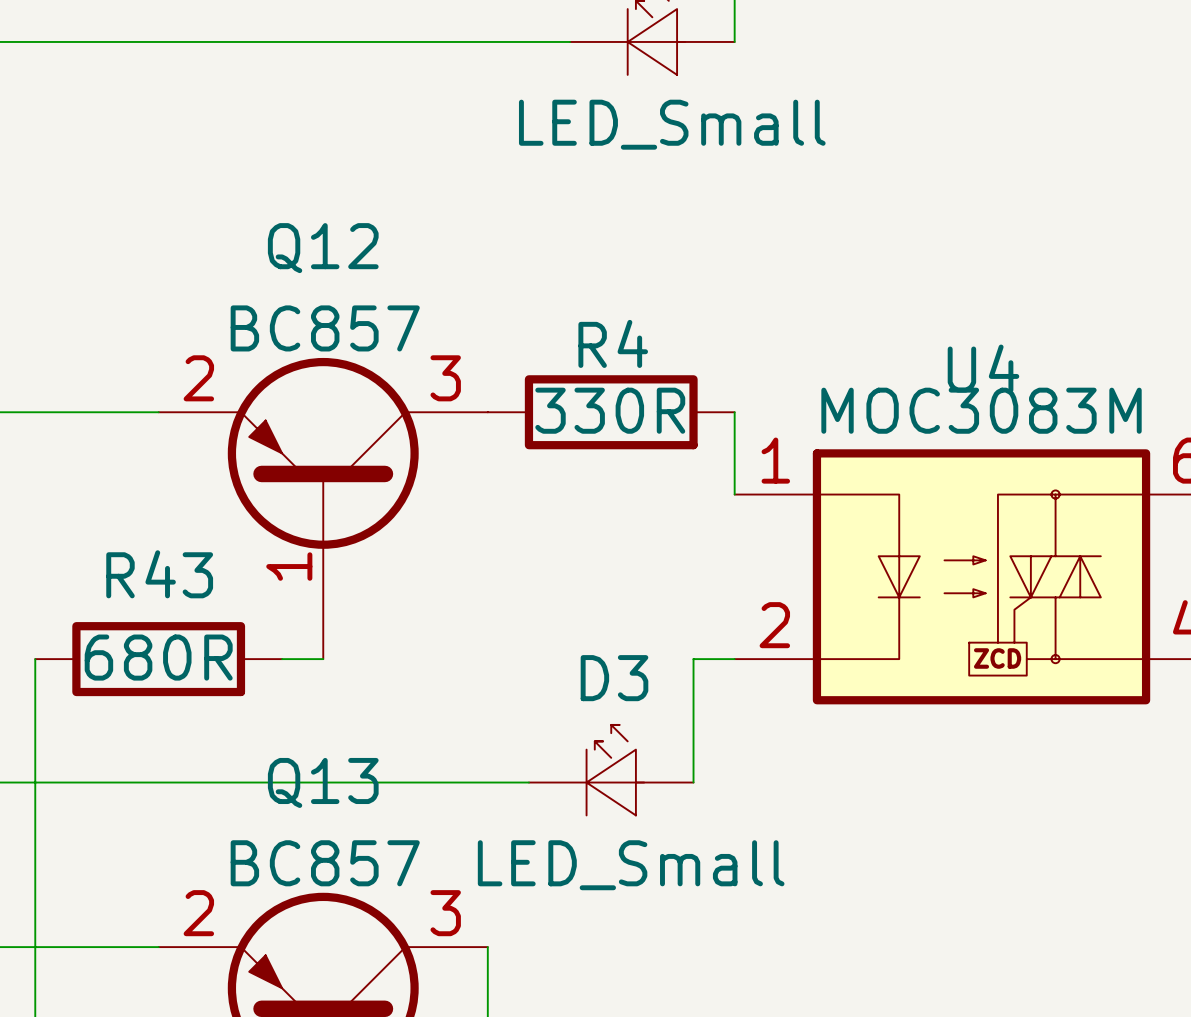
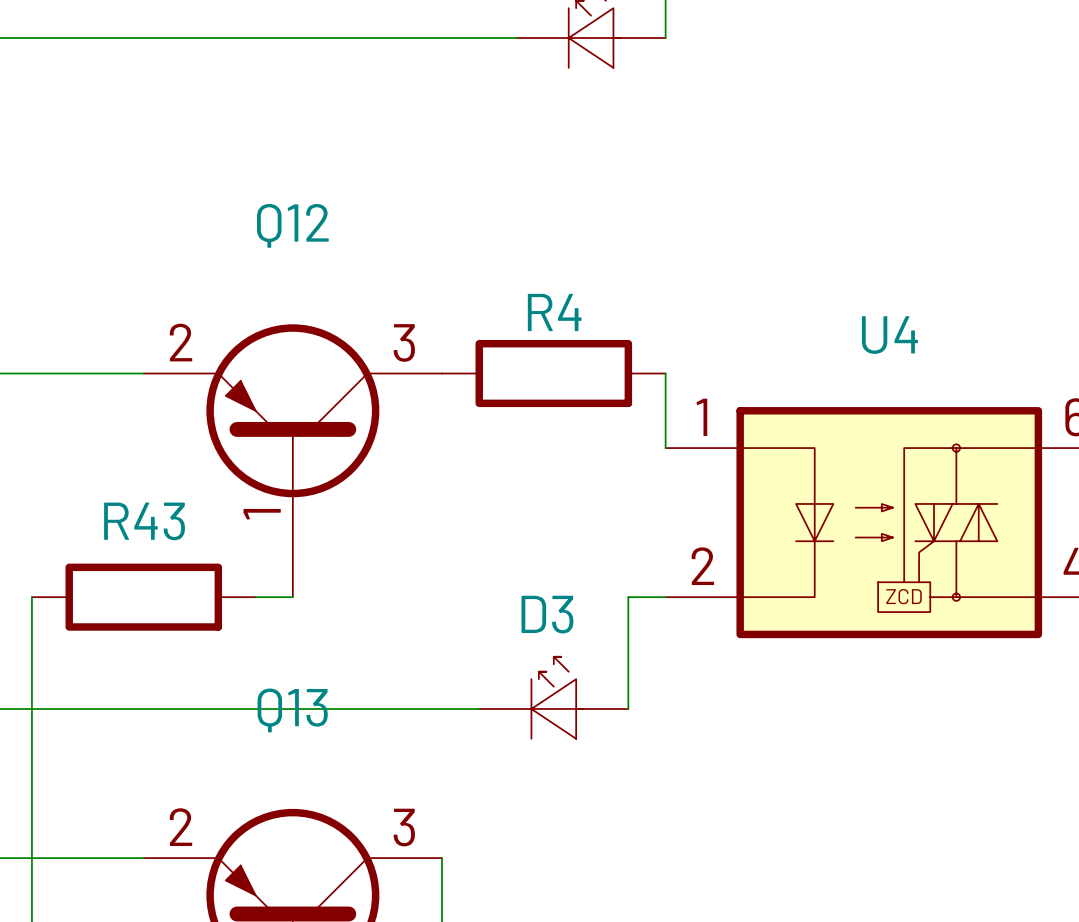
part value: LED_Small (672, 124) -> none
Q12 value: BC857 (325, 328) -> none
R4 value: 330R (610, 410) -> none
U4 value: MOC3083M (981, 410) -> none
R43 value: 680R (158, 657) -> none
Q13 value: BC857 (325, 863) -> none
D3 value: LED_Small (631, 865) -> none

